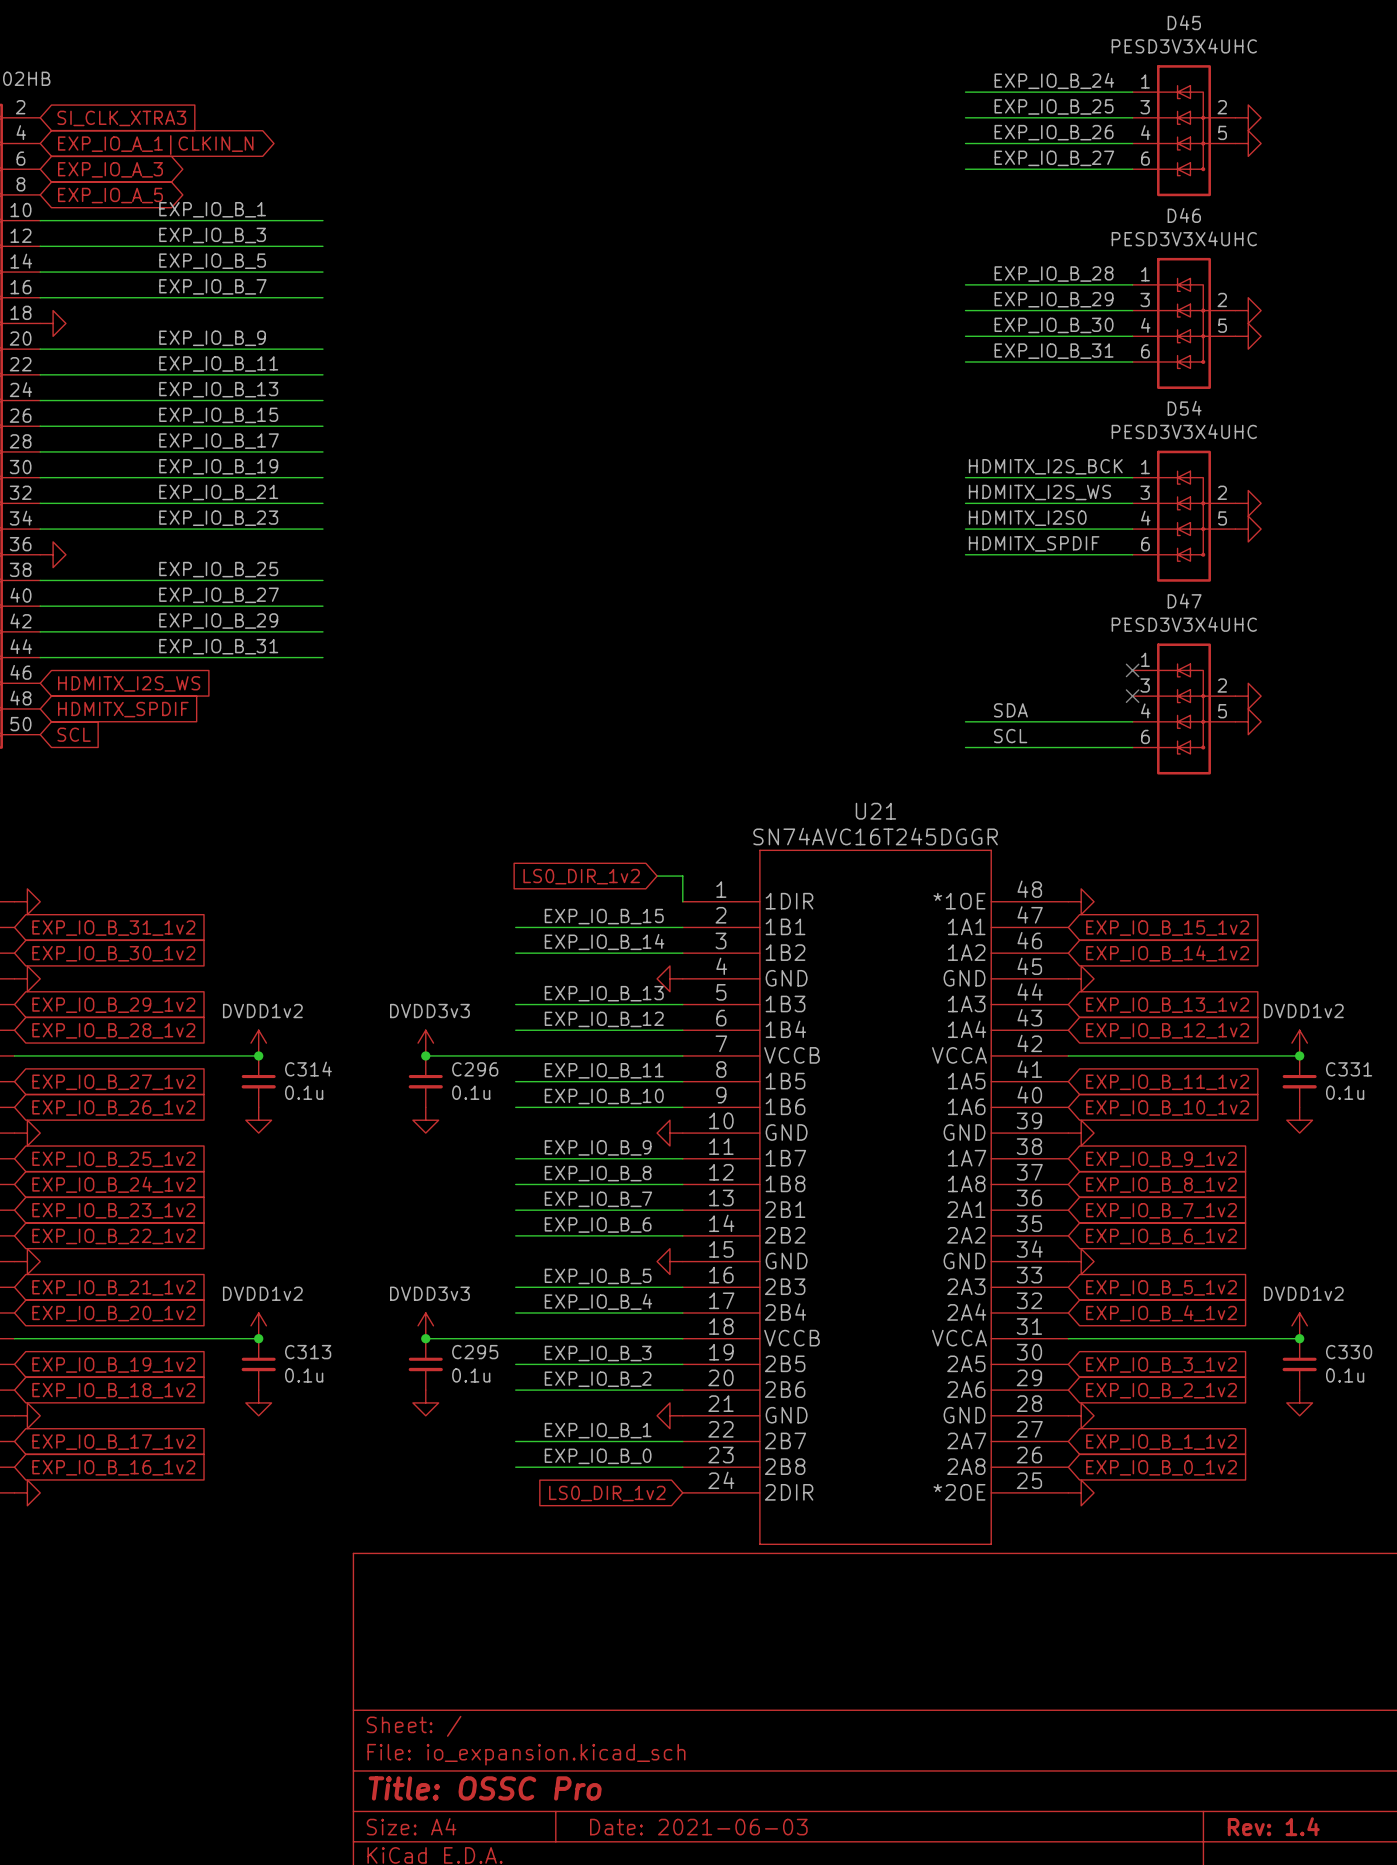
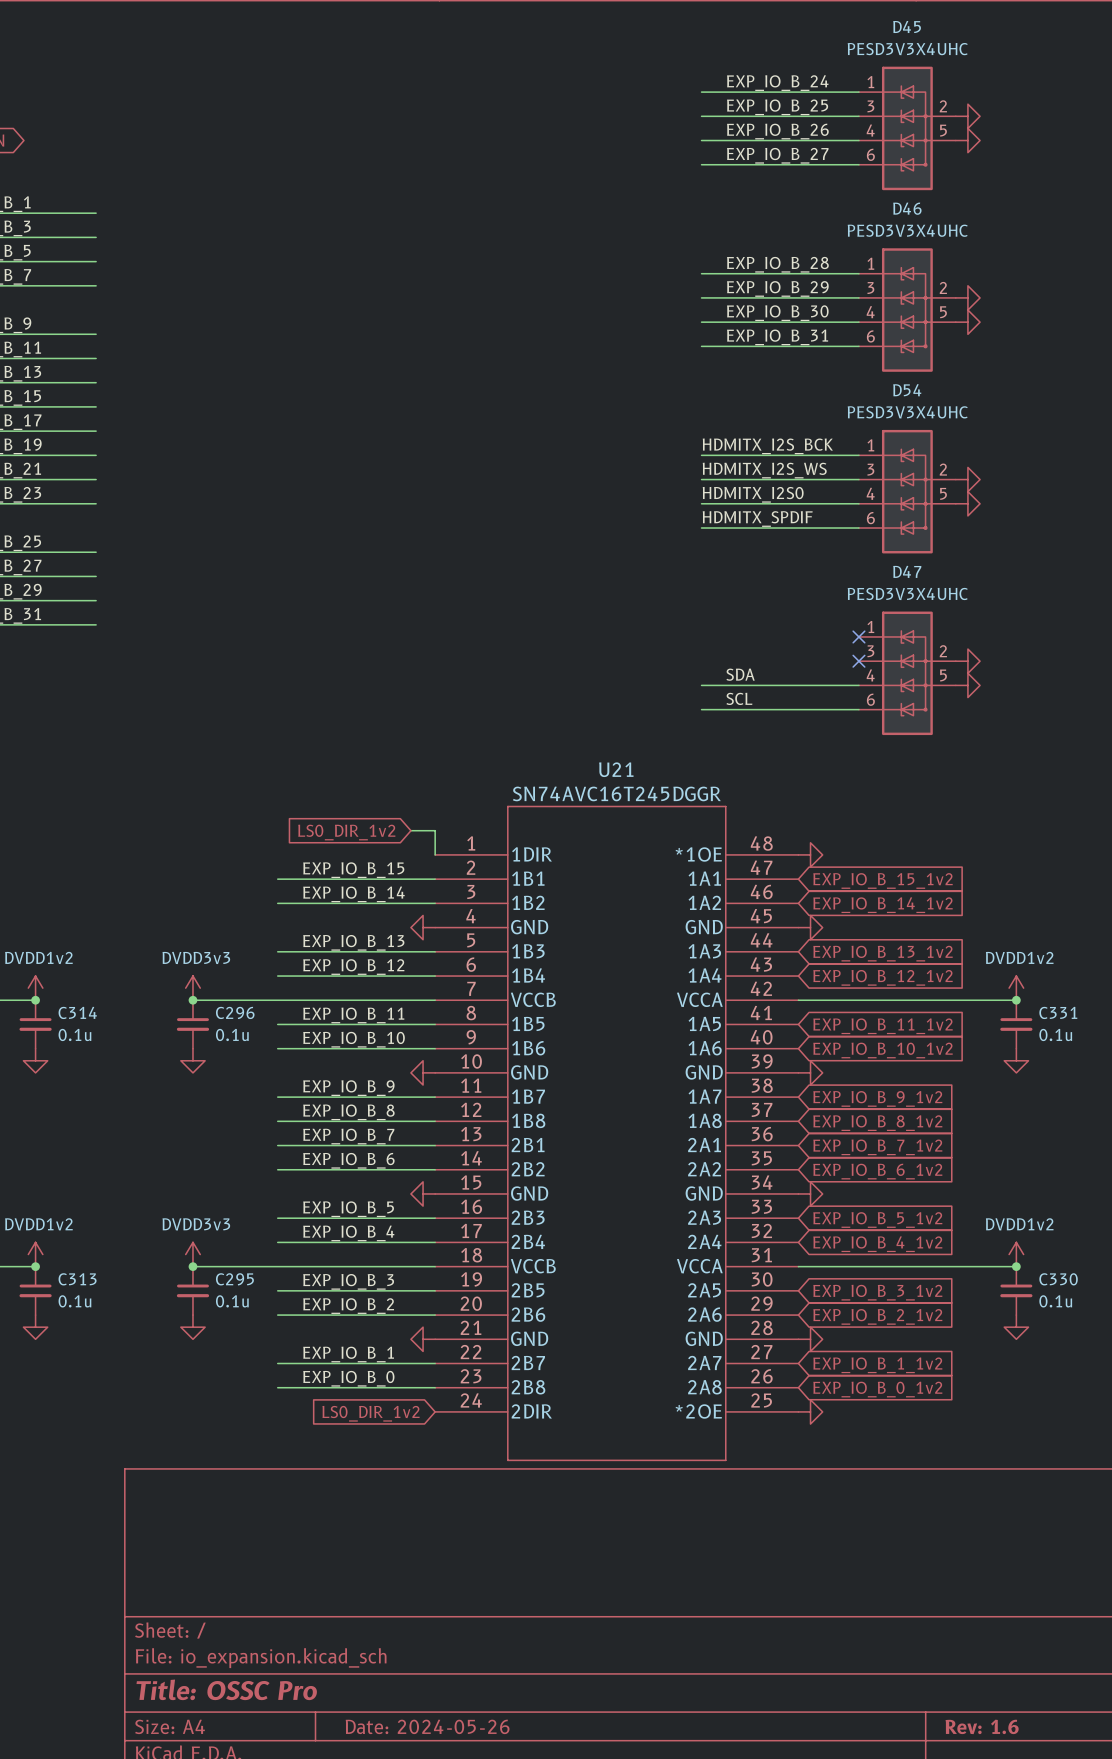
title block: Rev: 1.4 (1273, 1826) -> Rev: 1.6 (982, 1726)
title block: Date: 2021-06-03 (698, 1827) -> Date: 2024-05-26 (427, 1726)

